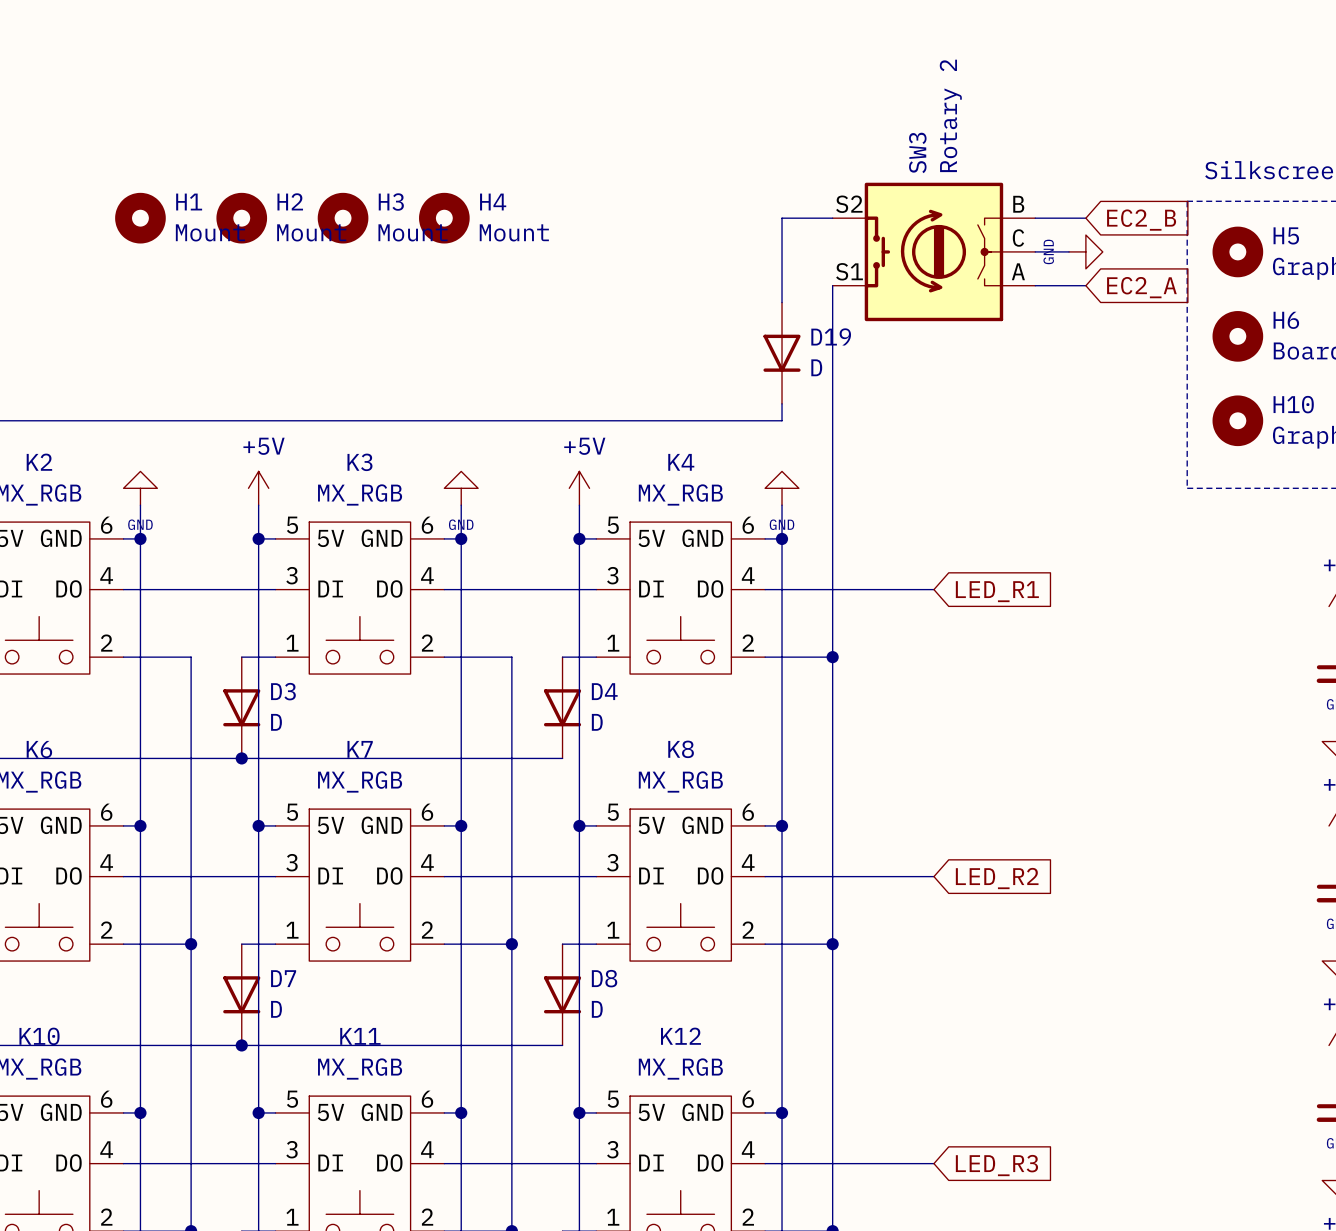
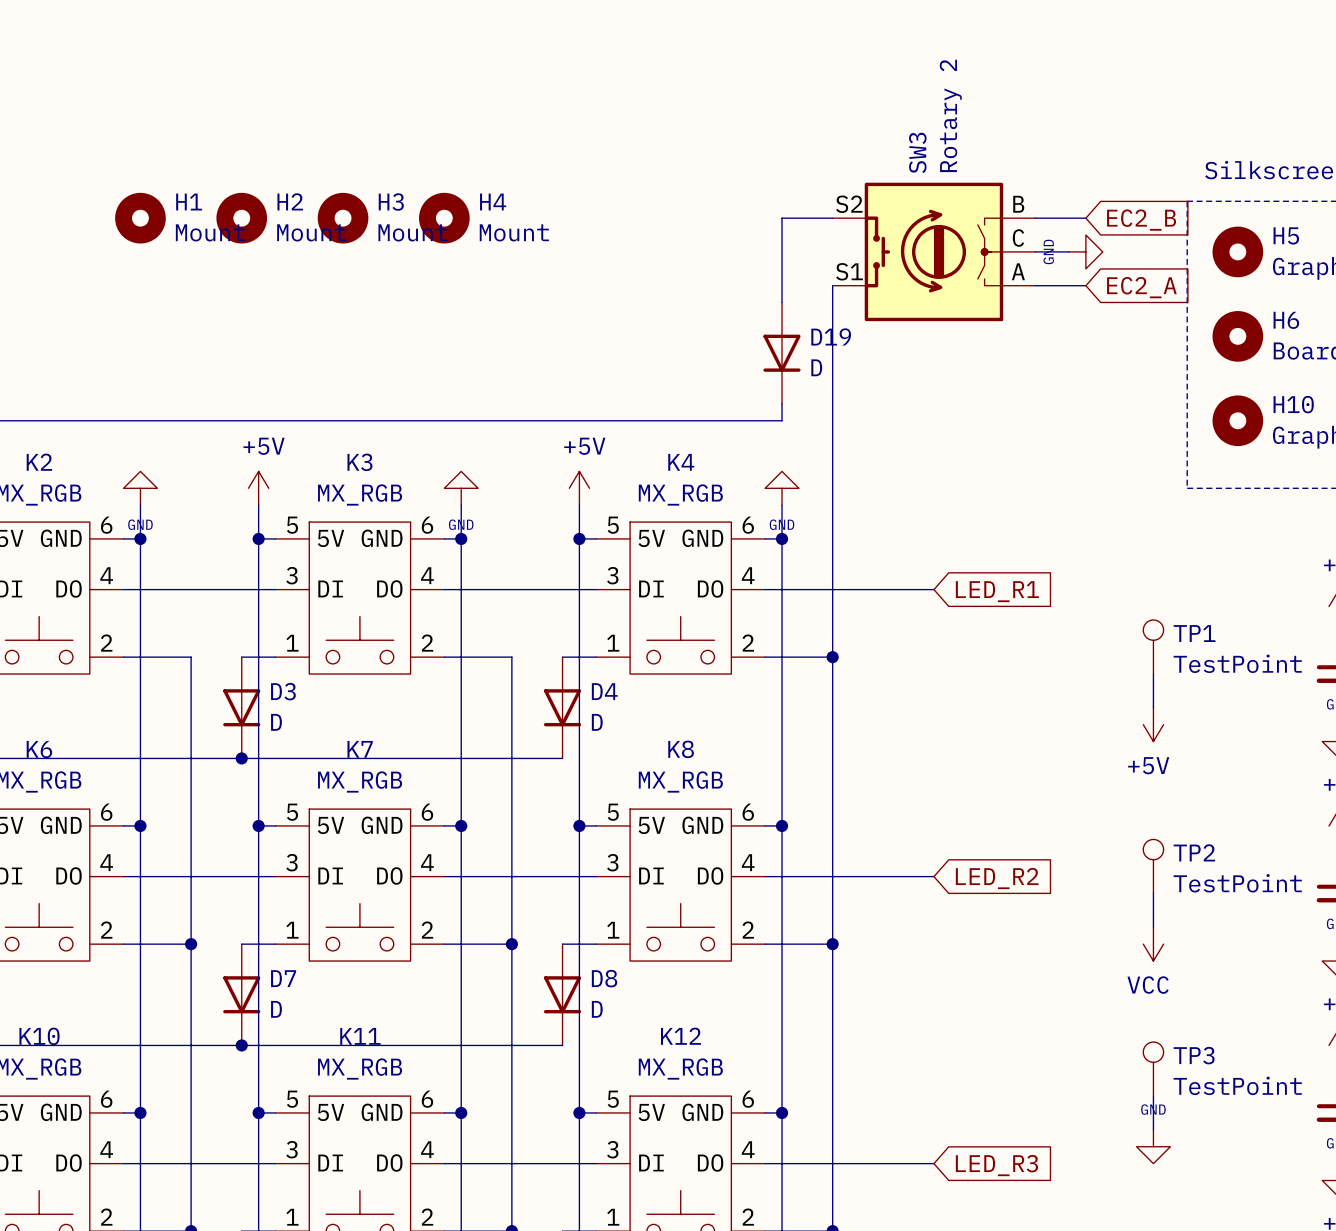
TP1: none -> TestPoint (1153, 647)
wire: none -> (1153, 674) (1153, 707)
power symbol: none -> +5V (1153, 724)
TP2: none -> TestPoint (1153, 866)
wire: none -> (1153, 893) (1153, 927)
power symbol: none -> VCC (1153, 944)
TP3: none -> TestPoint (1153, 1069)
wire: none -> (1153, 1096) (1153, 1129)
power symbol: none -> GND (1153, 1146)

